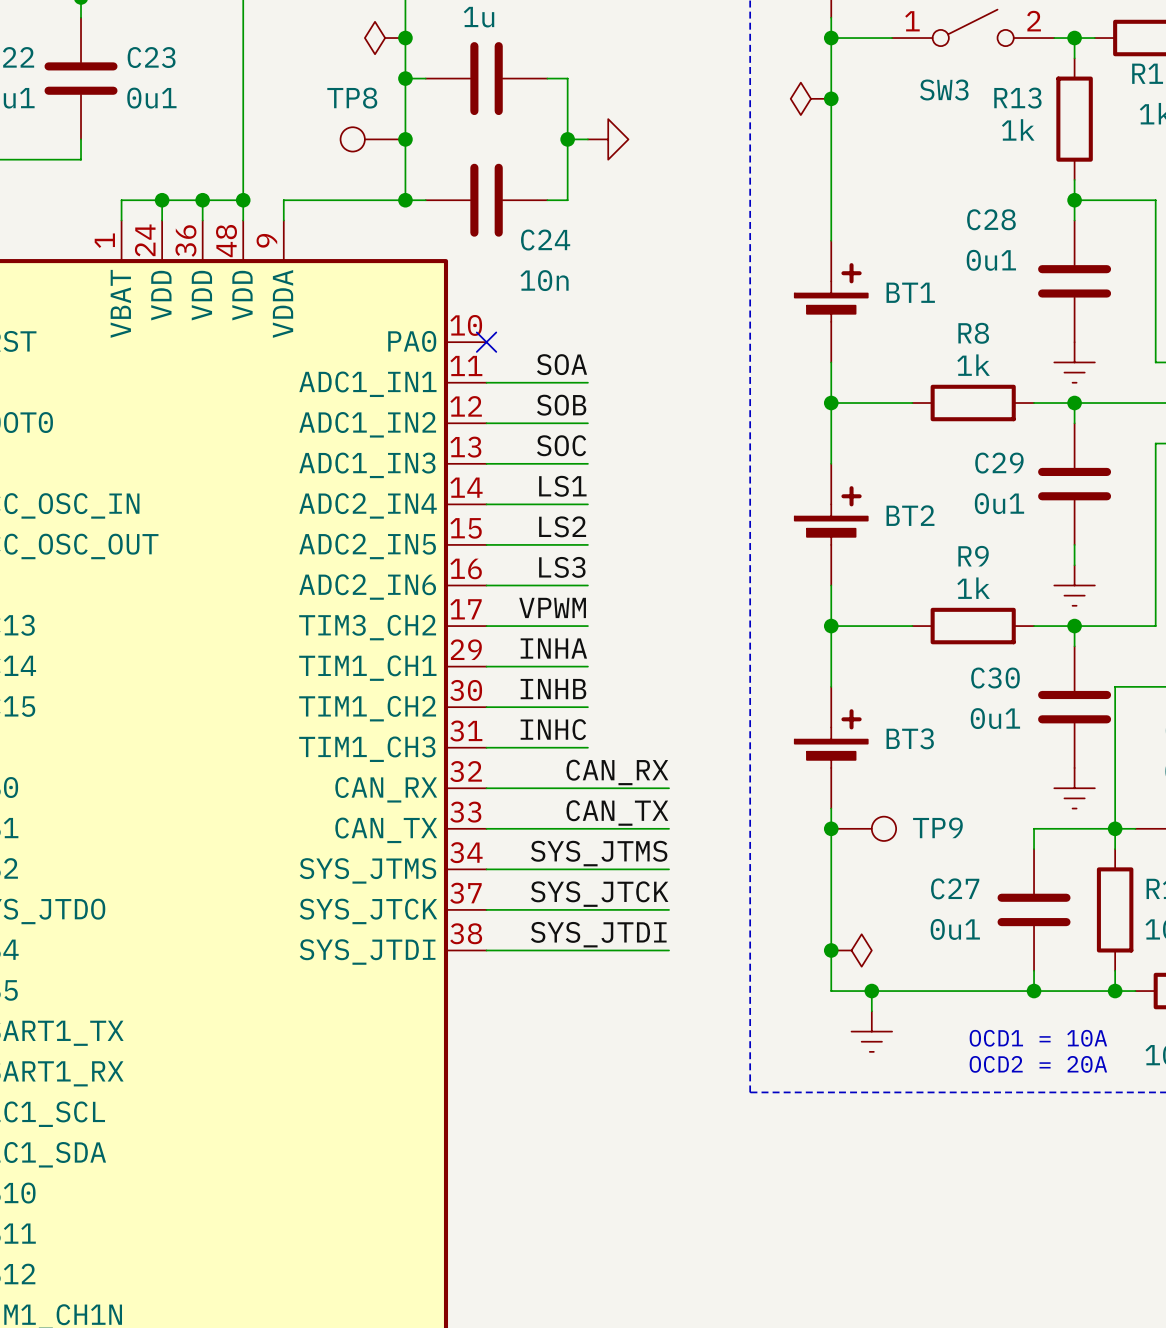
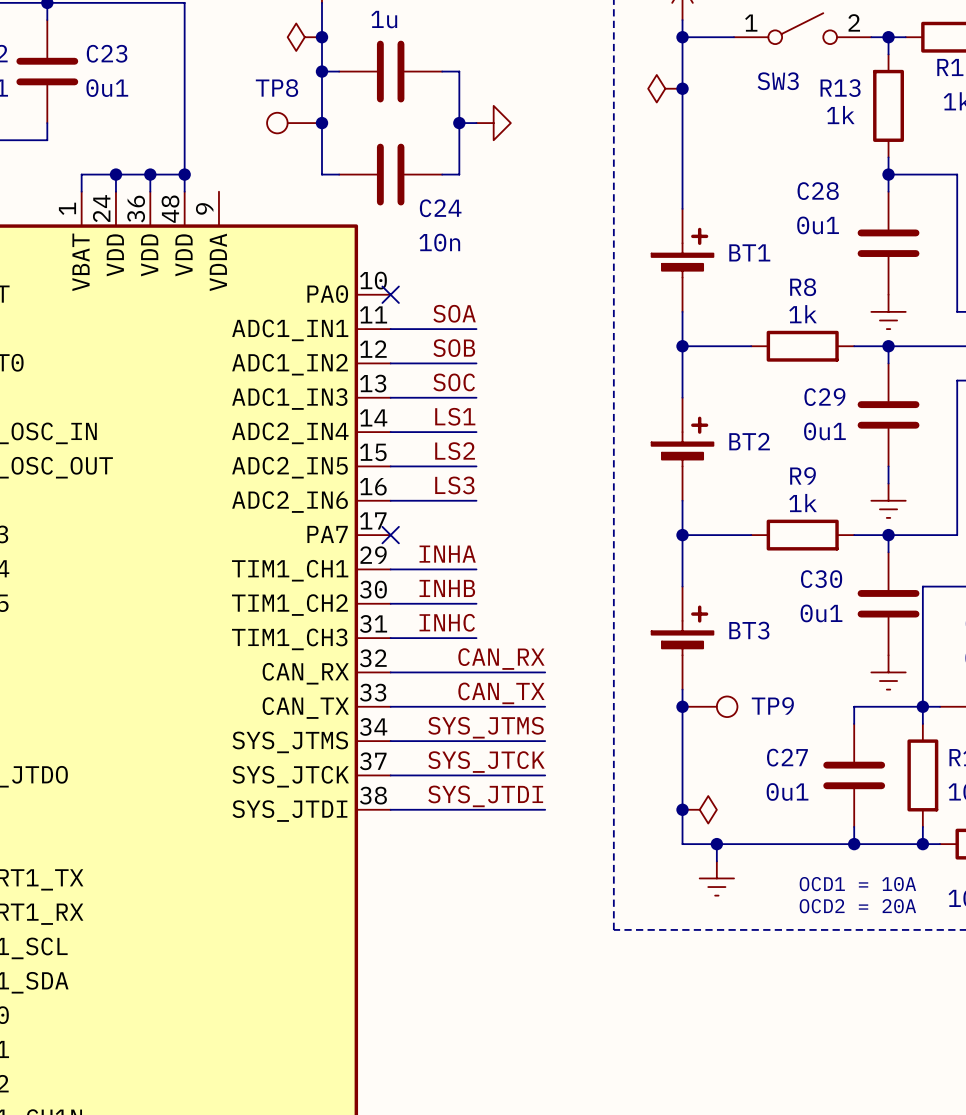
wire: (405, 200) (283, 200) (283, 220) -> none
junction: (405, 200) -> none
label: VPWM (552, 607) -> none
wire: (486, 626) (587, 626) -> none
no-connect mark: none -> (390, 535)
part pin name: TIM3_CH2 (367, 627) -> PA7 (327, 534)

